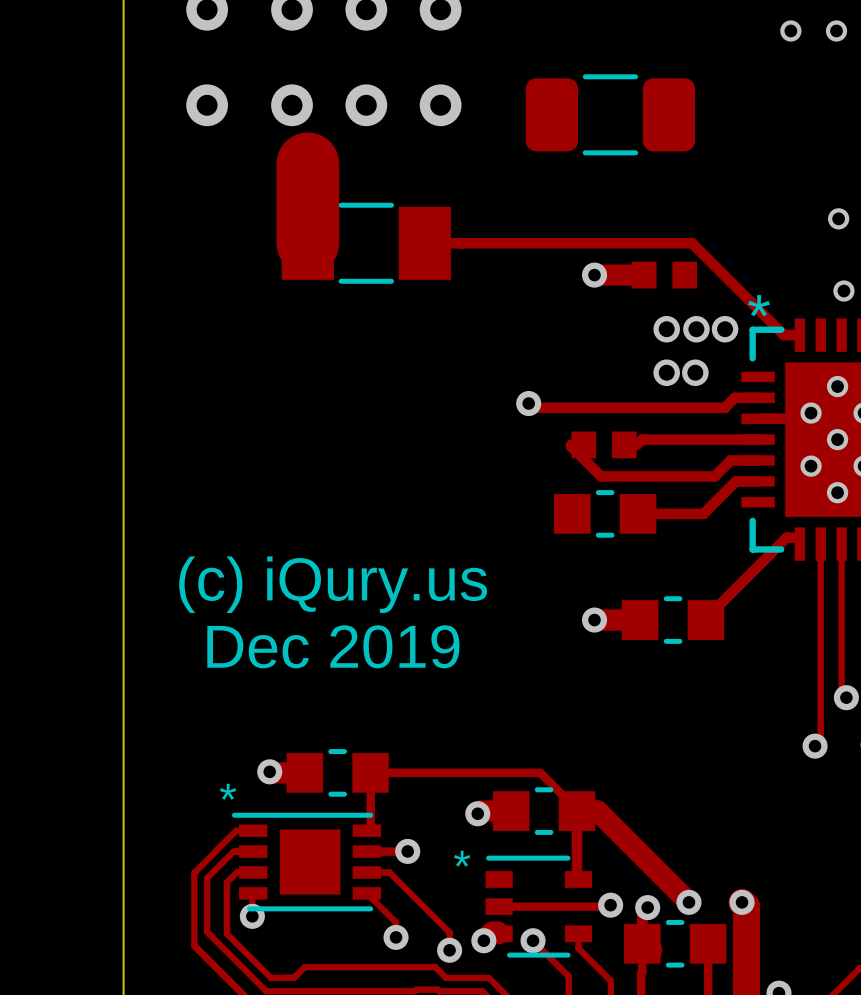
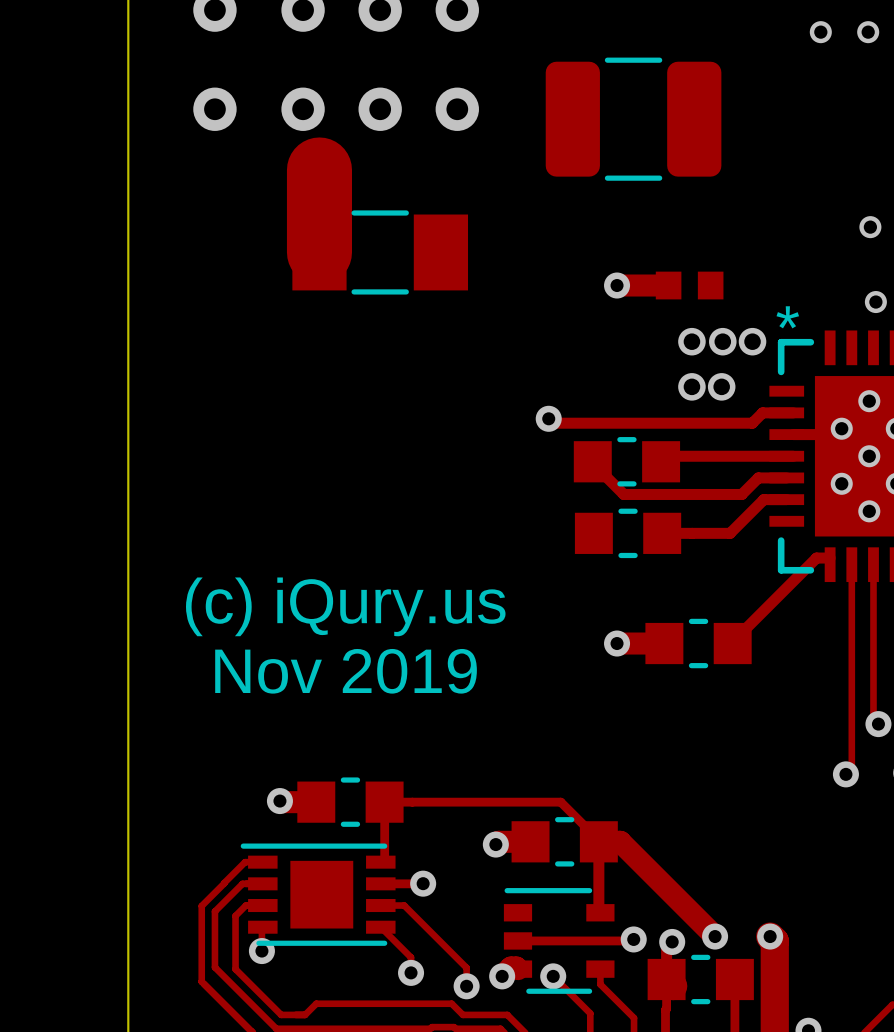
part footprint: [525, 74, 696, 156] -> [545, 57, 722, 181]
track: (424, 243) (692, 243) (784, 335) (799, 335) -> none
part footprint: [571, 431, 637, 459] -> [573, 437, 681, 487]
text: Dec 2019 (333, 646) -> Nov 2019 (346, 671)
text: * (228, 791) -> none
text: * (462, 858) -> none

